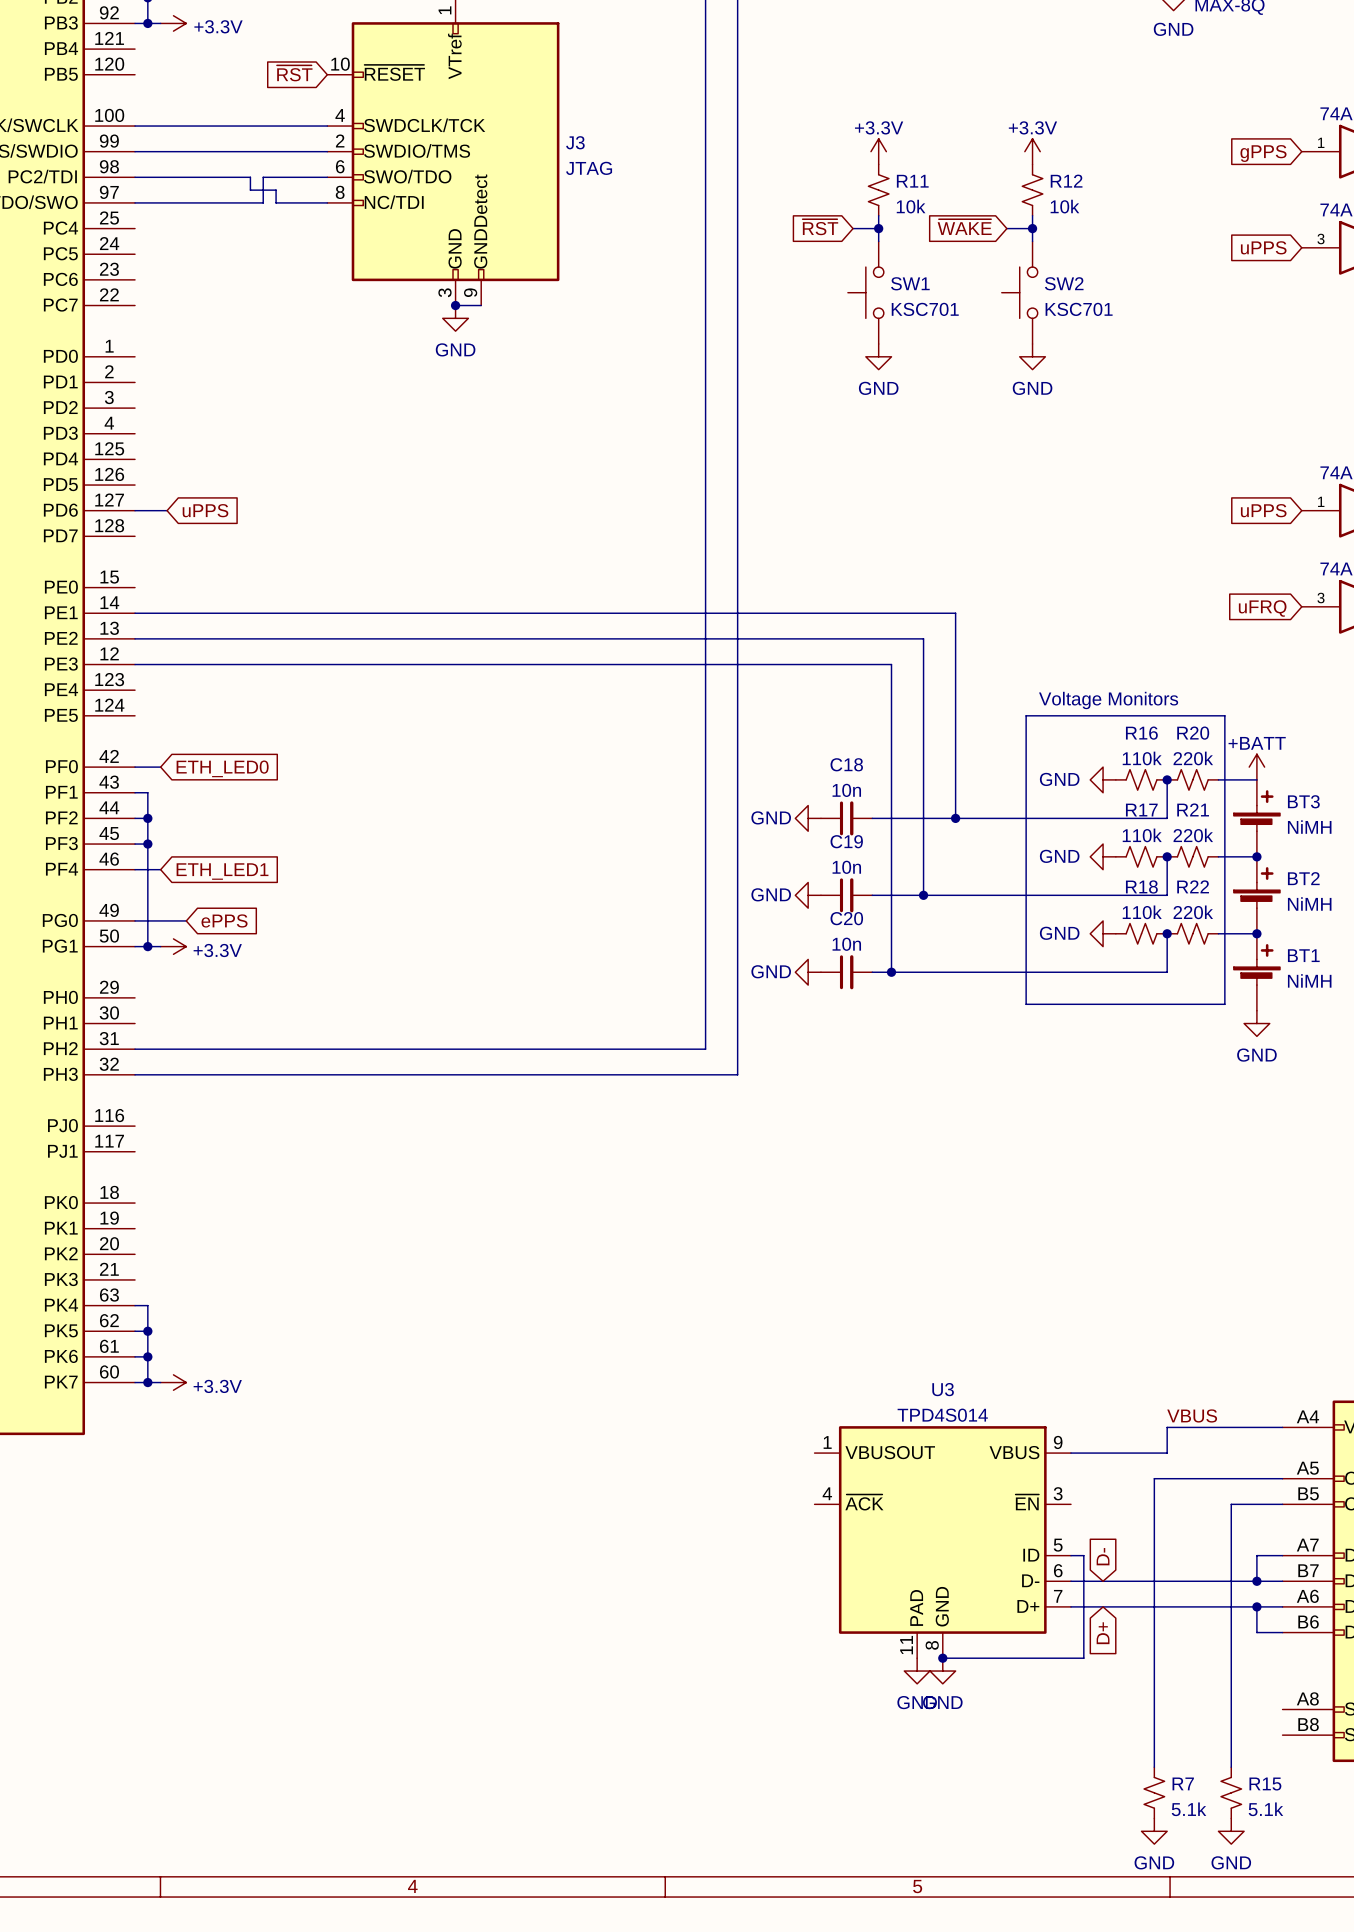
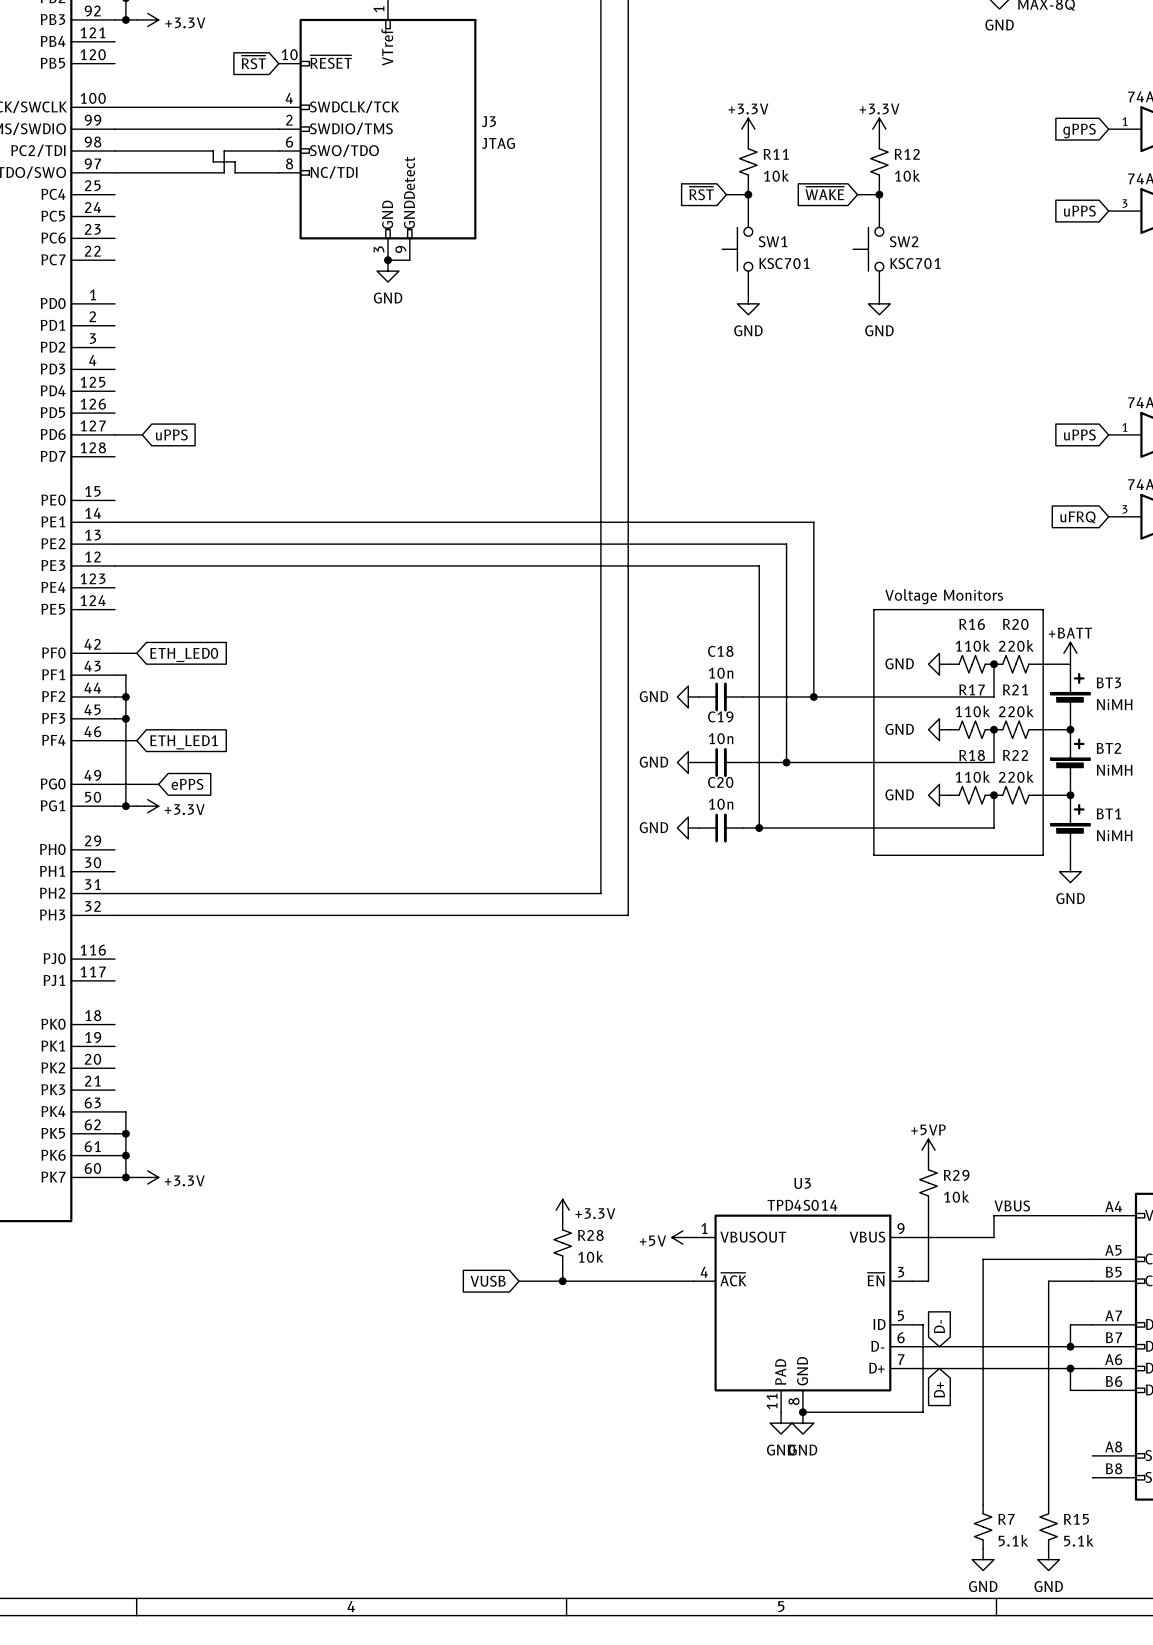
power symbol: none -> +5VP (928, 1150)
R29: none -> 10k (928, 1182)
wire: none -> (928, 1204) (928, 1281) (912, 1281)
power symbol: none -> +3.3V (562, 1210)
power symbol: none -> +5V (682, 1237)
R28: none -> 10k (562, 1242)
wire: none -> (562, 1264) (562, 1281)
global label: none -> VUSB (488, 1281)
wire: none -> (519, 1281) (693, 1281)
junction: none -> (562, 1281)

